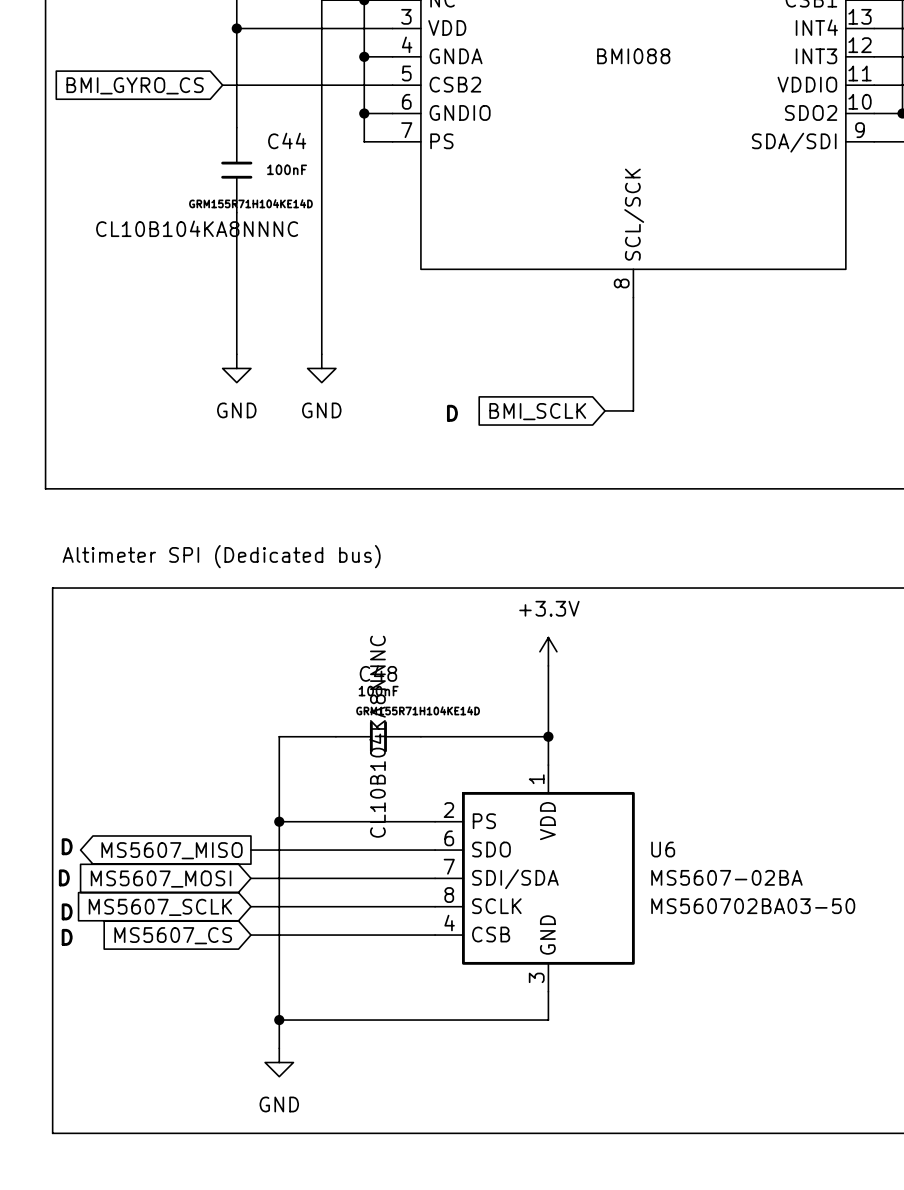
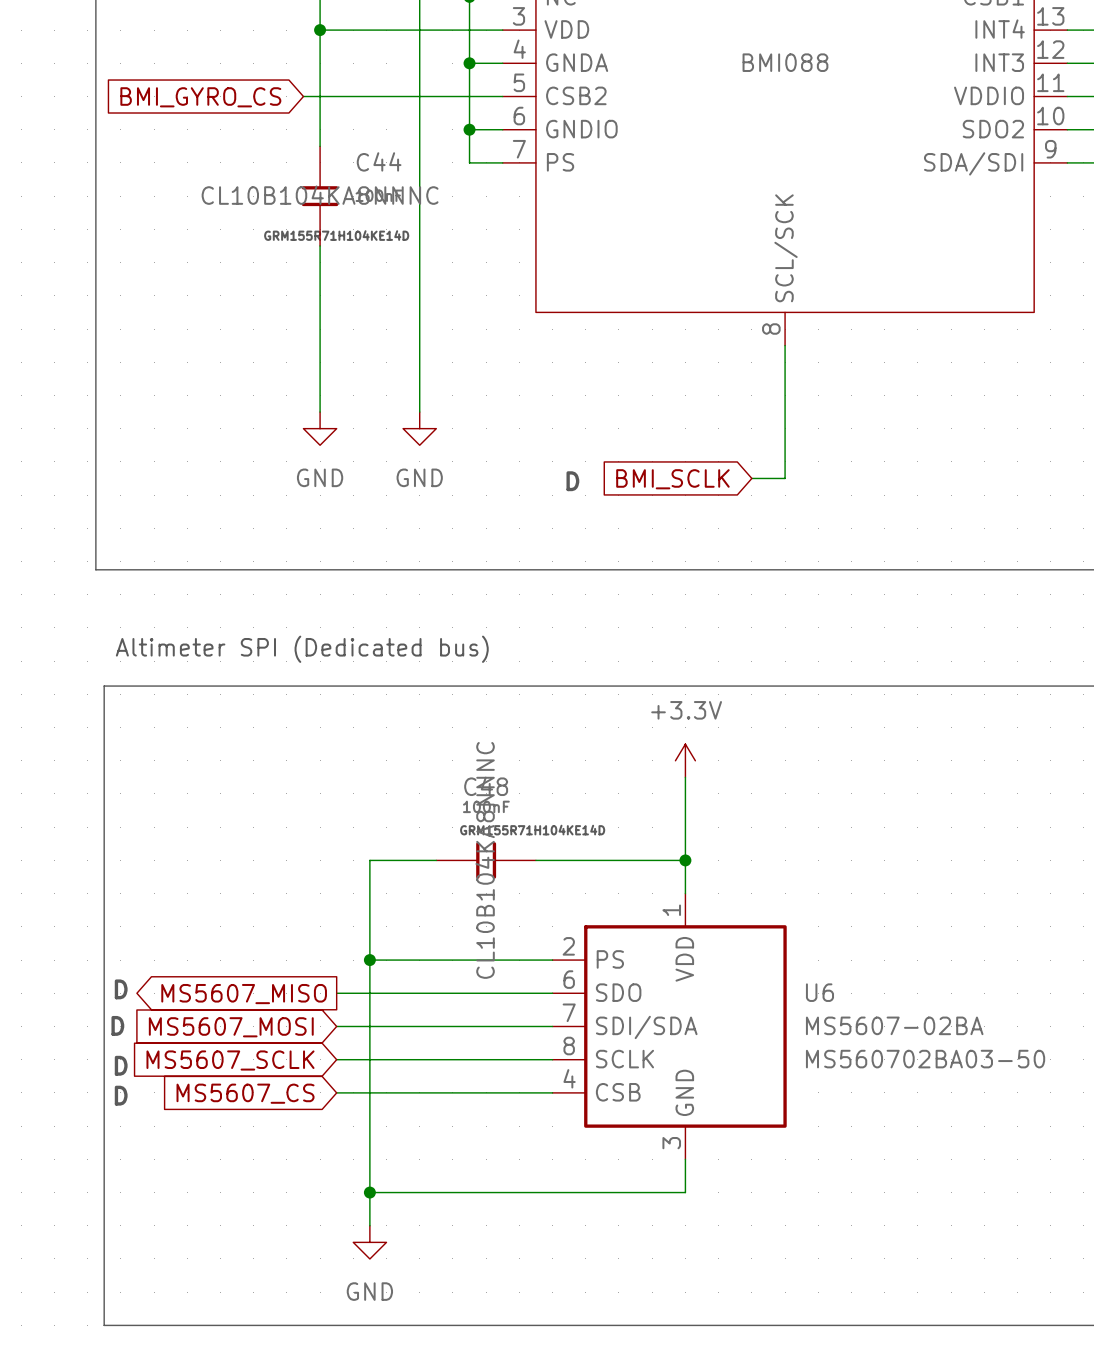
C44 text position: CL10B104KA8NNNC (197, 228) -> CL10B104KA8NNNC (320, 195)

